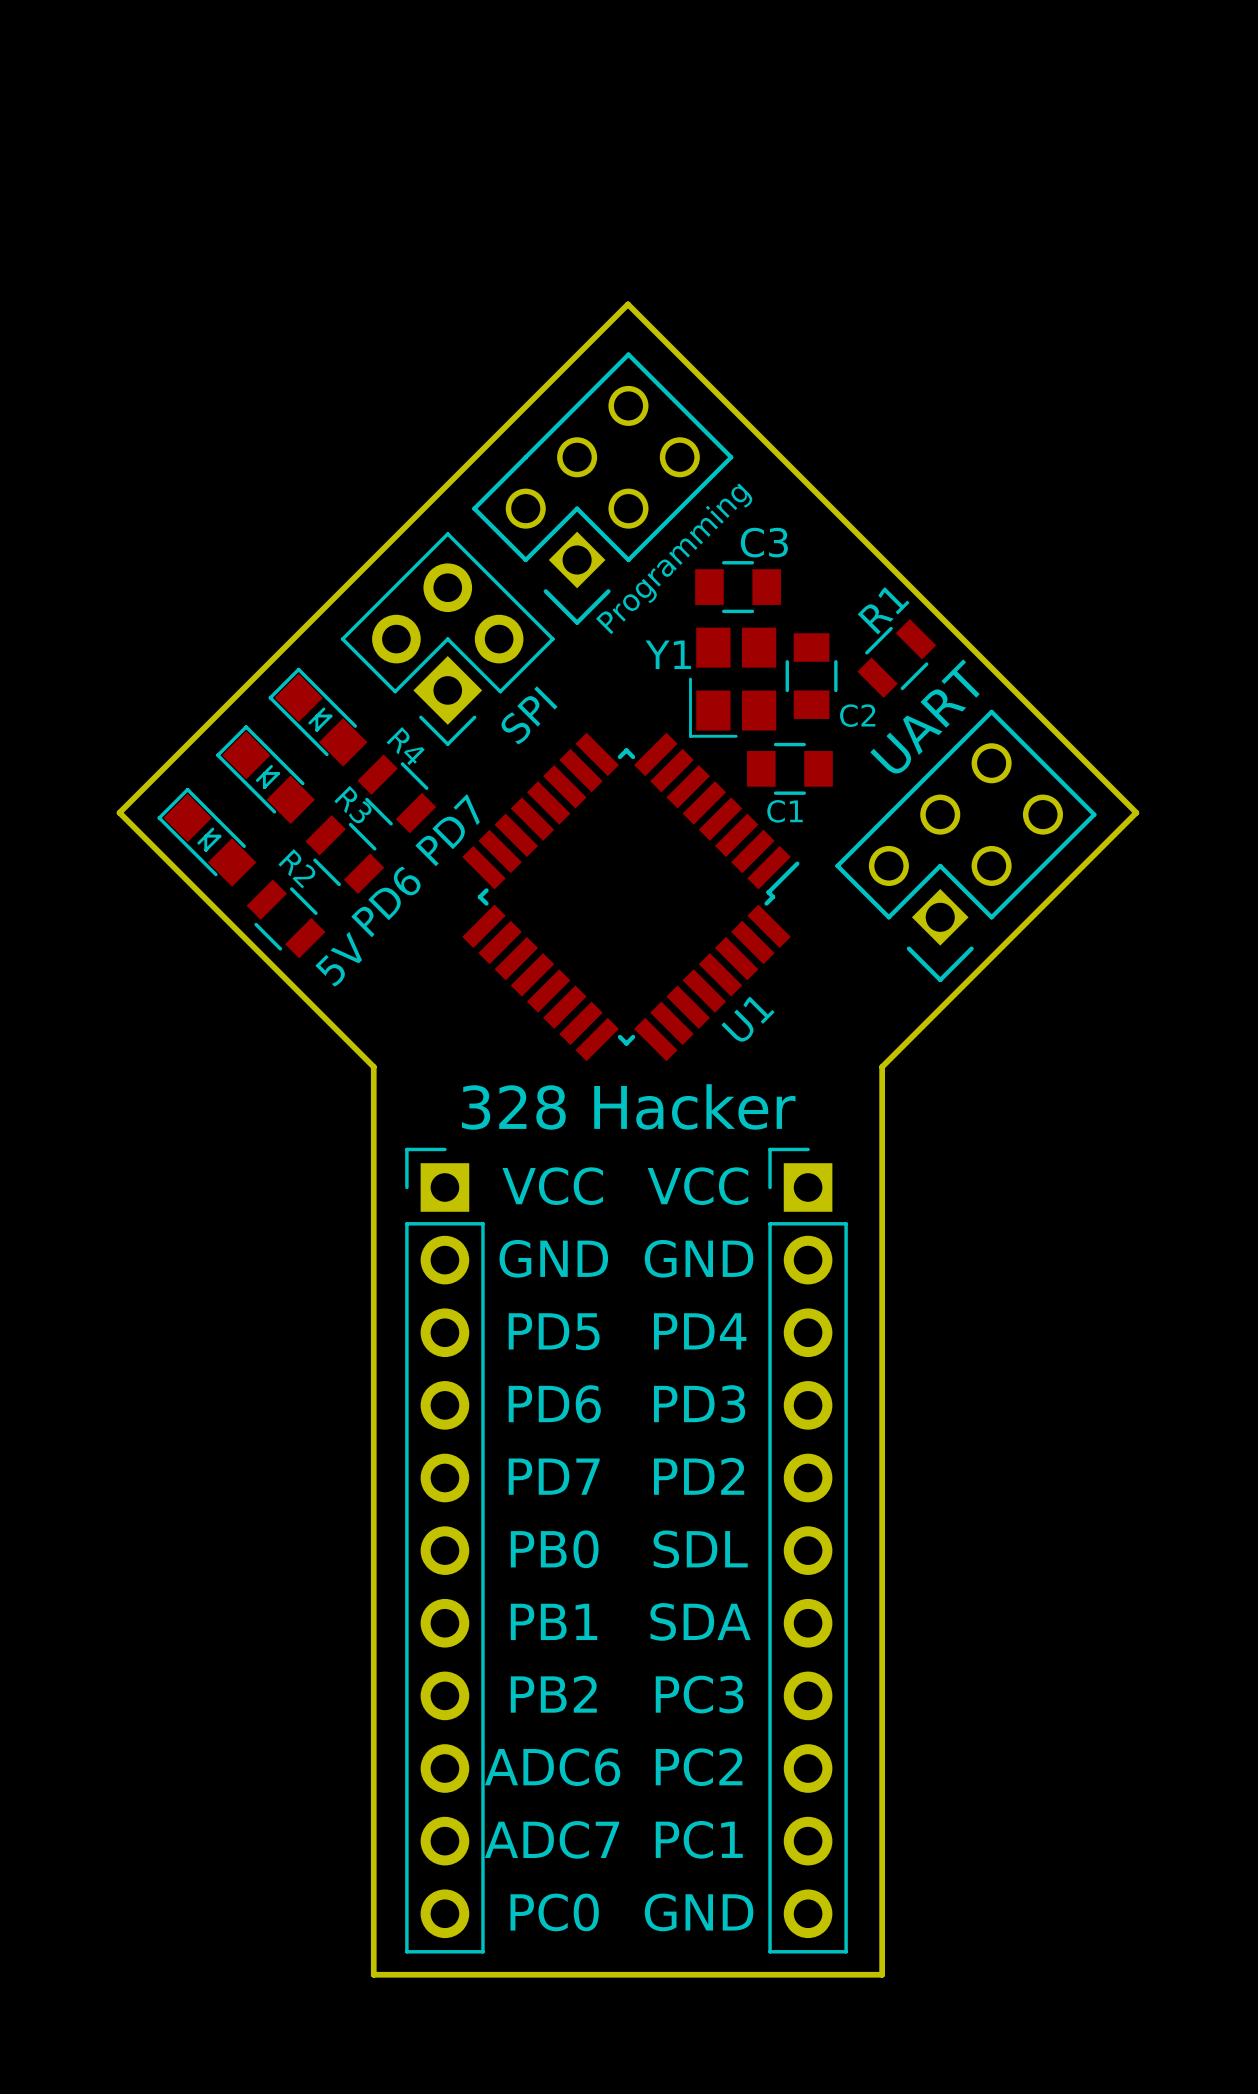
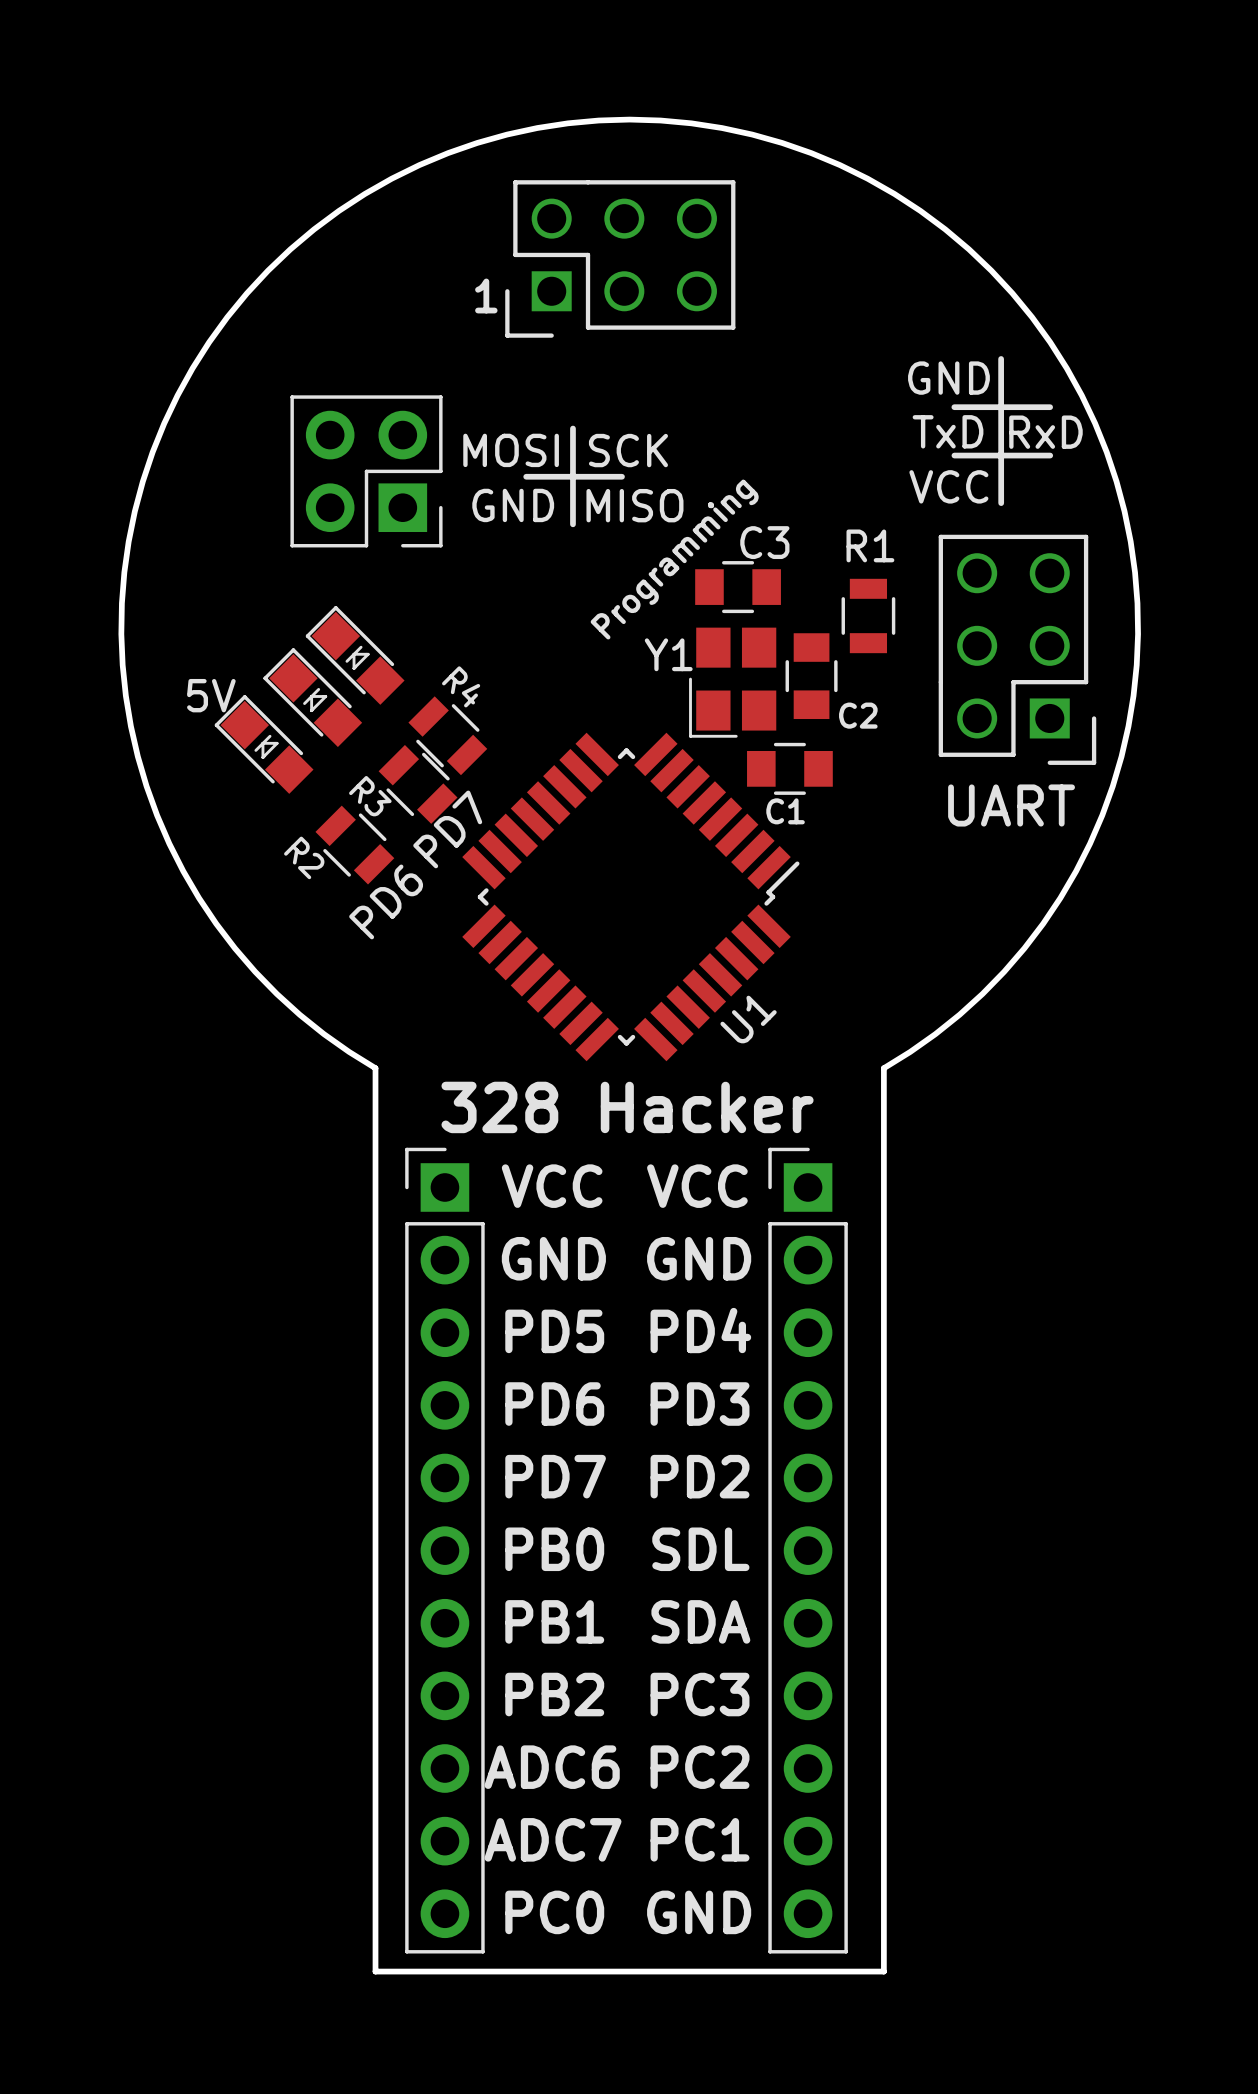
part: none -> (620, 258)
text: none -> 1 (486, 295)
board edge: (627, 304) (1136, 812) (882, 1066) (882, 1974) (373, 1974) (373, 1066) (119, 812) (627, 304) -> (375, 1068) (349, 1051) (299, 1014) (255, 971) (216, 923) (183, 871) (169, 843) (157, 815) (137, 756) (130, 726) (122, 665) (121, 603) (124, 572) (134, 511) (152, 452) (164, 423) (192, 368) (209, 342) (246, 293) (290, 249) (338, 210) (391, 178) (419, 165) (477, 142) (507, 134) (537, 128) (598, 120) (660, 120) (722, 128) (782, 142) (811, 153) (839, 165) (894, 194) (945, 229) (991, 270) (1012, 293) (1050, 342) (1081, 395) (1106, 452) (1124, 511) (1135, 572) (1138, 634) (1133, 695) (1121, 756) (1102, 815) (1076, 871) (1043, 923) (1024, 948) (982, 993) (935, 1034) (883, 1068) (883, 1971) (375, 1971) (375, 1068)
line: none -> (1001, 358) (1001, 503)
text: none -> GND (948, 378)
line: none -> (954, 407) (1050, 407)
line: none -> (572, 428) (572, 524)
text: none -> TxD (948, 431)
text: none -> RxD (1045, 432)
text: none -> MOSI (511, 450)
text: none -> SCK (628, 450)
line: none -> (954, 455) (1050, 455)
part: none -> (366, 471)
line: none -> (526, 476) (622, 476)
text: none -> VCC (948, 486)
part: (602, 488) -> none
text: none -> GND (513, 505)
text: none -> MISO (634, 505)
part: (447, 639) -> none
part: none -> (1017, 649)
part: none -> (355, 655)
R1 rotation: 0° (896, 658) -> 45° counterclockwise (868, 615)
R1 position: (896, 658) -> (868, 615)
text: SPI (529, 715) -> none
text rotation: 0° (924, 716) -> 45° clockwise (1011, 805)
part position: (318, 717) -> (312, 697)
R4 name position: R4 (405, 746) -> R4 (461, 686)
part position: (265, 774) -> (264, 744)
R4 position: (396, 793) -> (447, 735)
R3 name position: R3 (353, 804) -> R3 (370, 796)
part: (206, 837) -> none
part: (965, 845) -> none
R3 position: (344, 854) -> (418, 784)
R2 name position: R2 (296, 868) -> R2 (304, 857)
R2 position: (286, 918) -> (354, 845)
text rotation: 0° (338, 959) -> 45° clockwise (211, 695)
text position: 5V (338, 959) -> 5V (211, 695)

